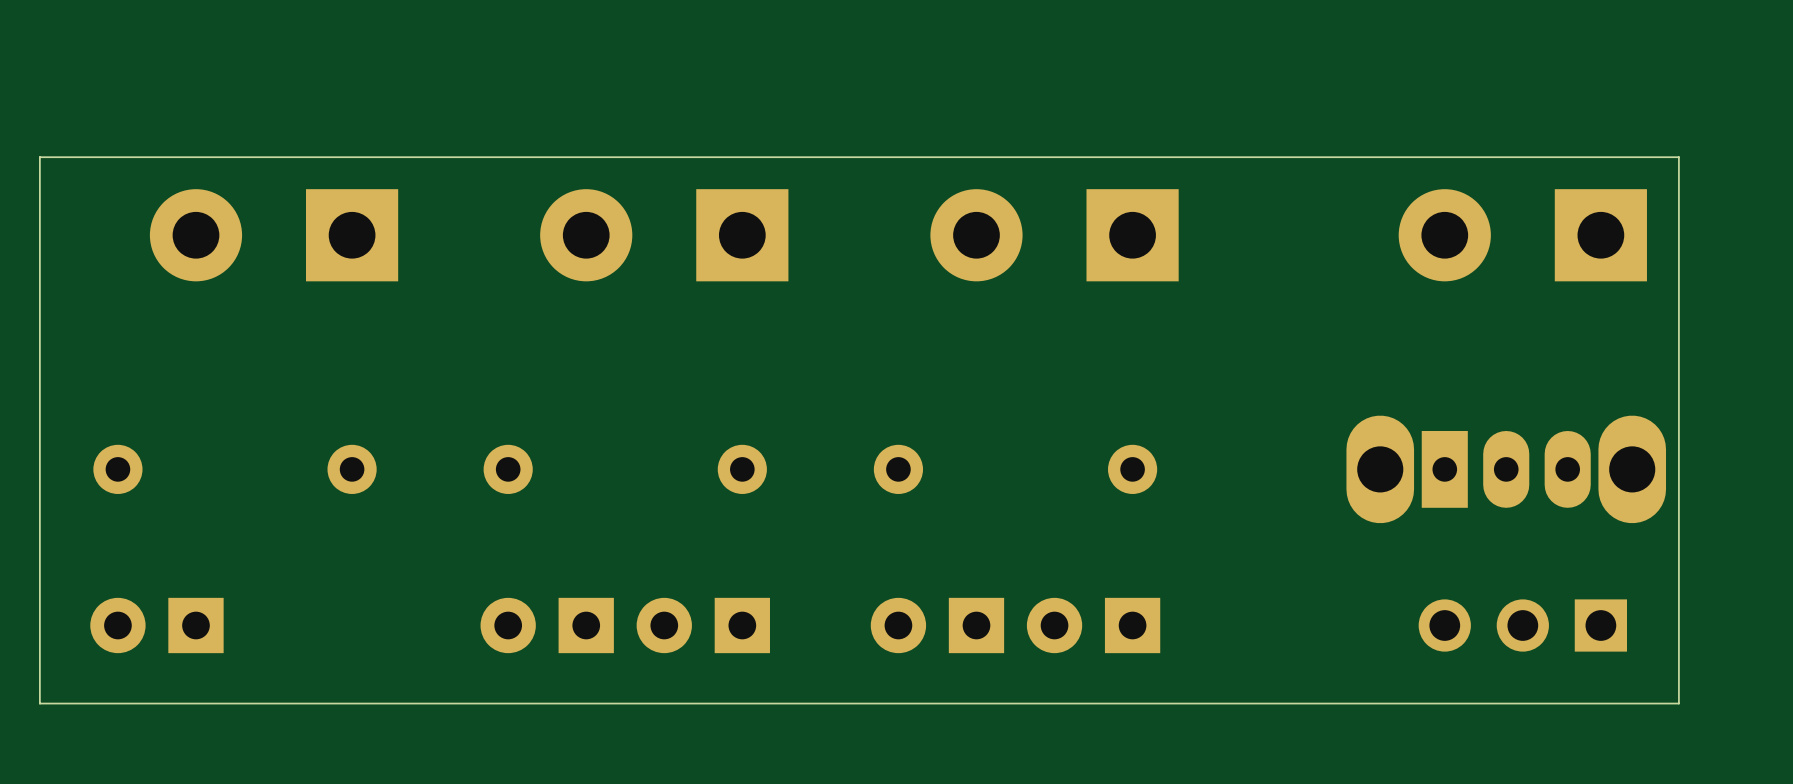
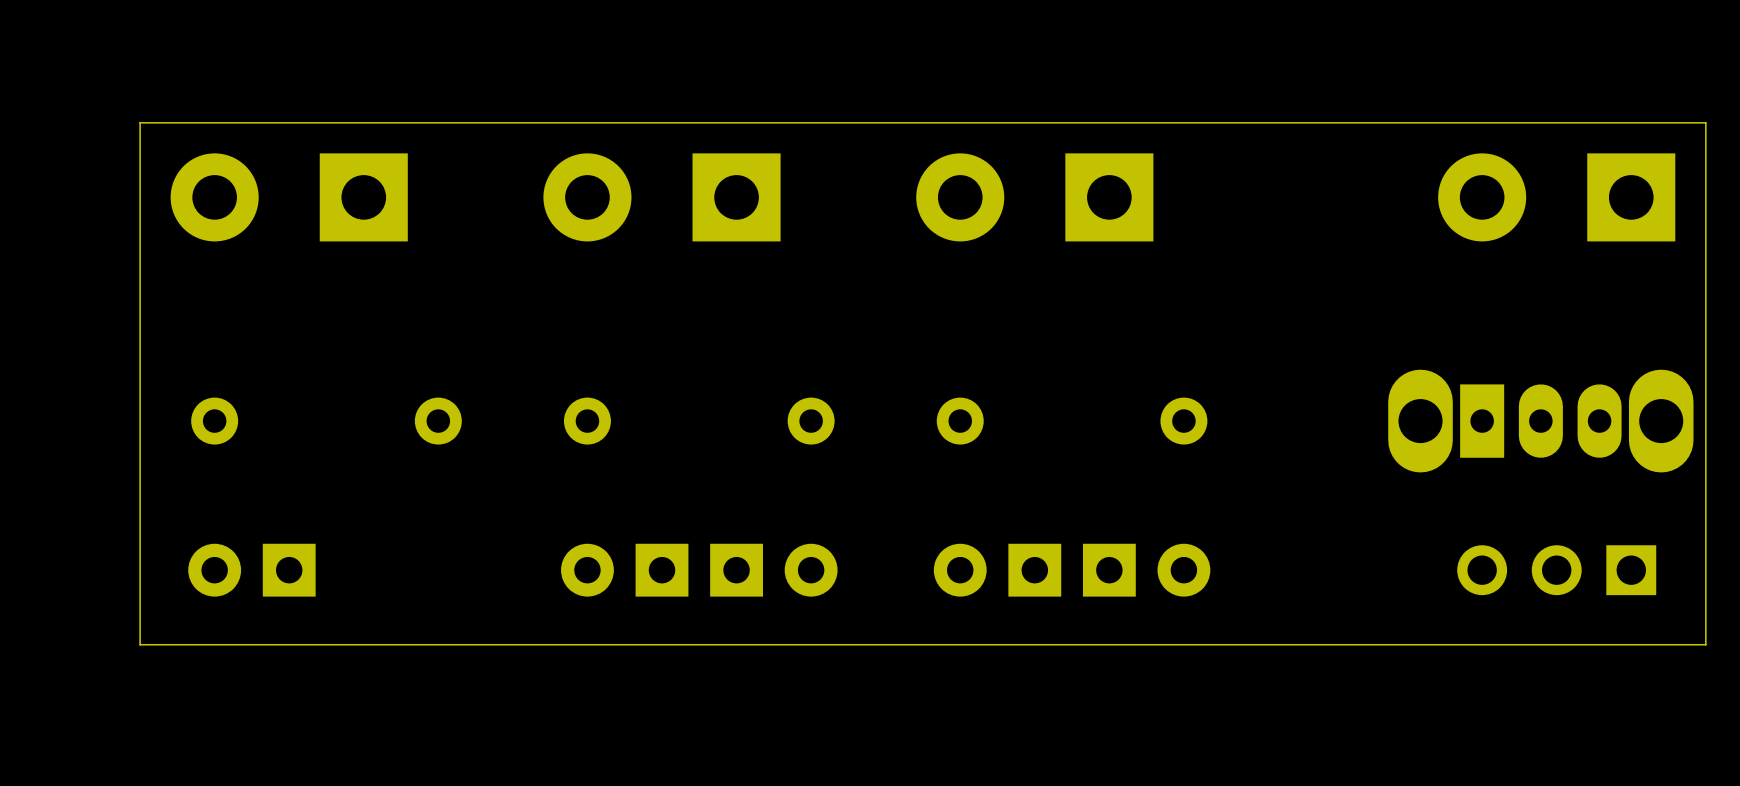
part position: (274, 235) -> (289, 197)
part position: (664, 235) -> (662, 197)
part position: (1054, 235) -> (1034, 197)
part rotation: 0° (703, 625) -> 180° (773, 570)
part rotation: 0° (1093, 625) -> 180° (1146, 570)

